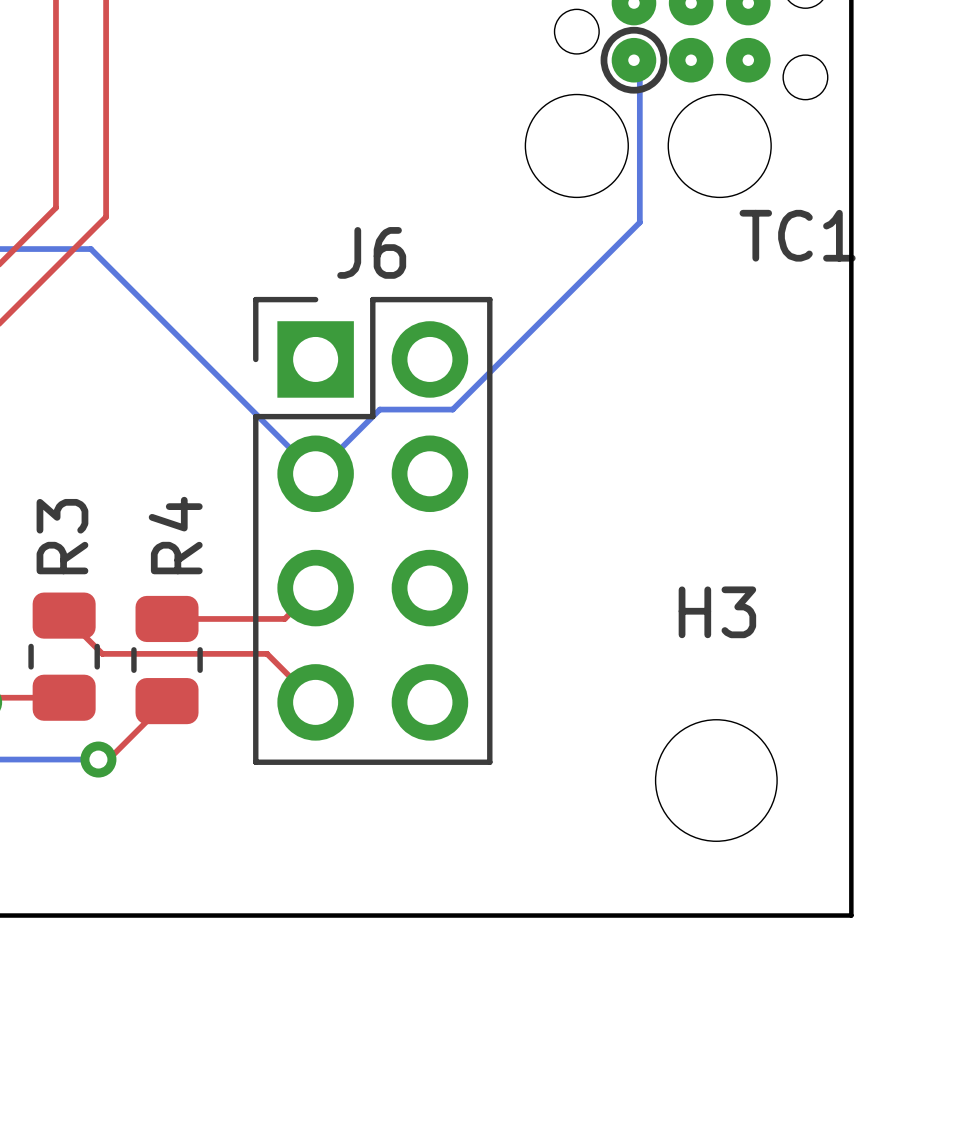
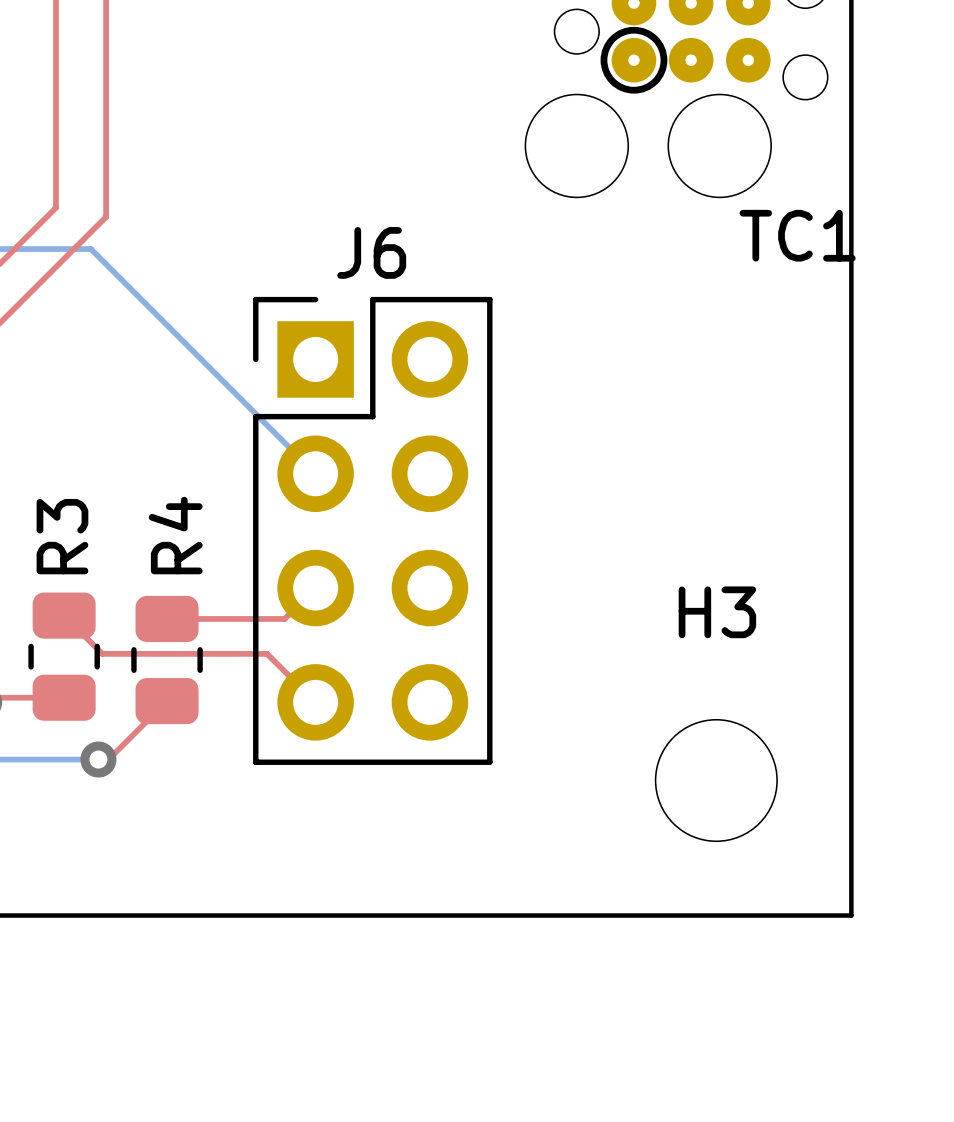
bottom track: (633, 60) (639, 66) (639, 222) (452, 409) (379, 409) (315, 473) -> none

